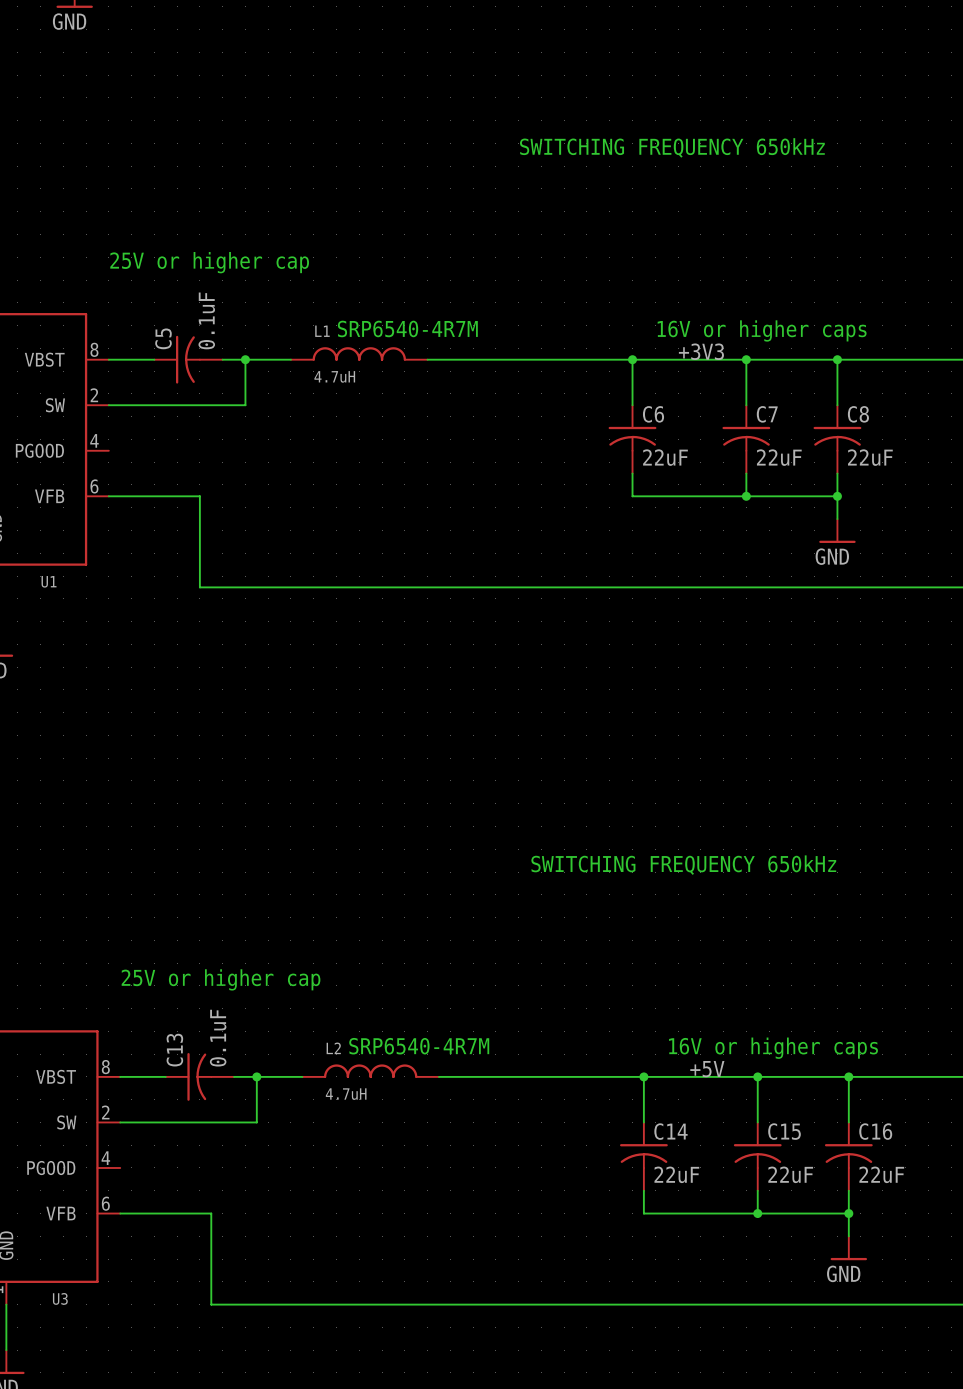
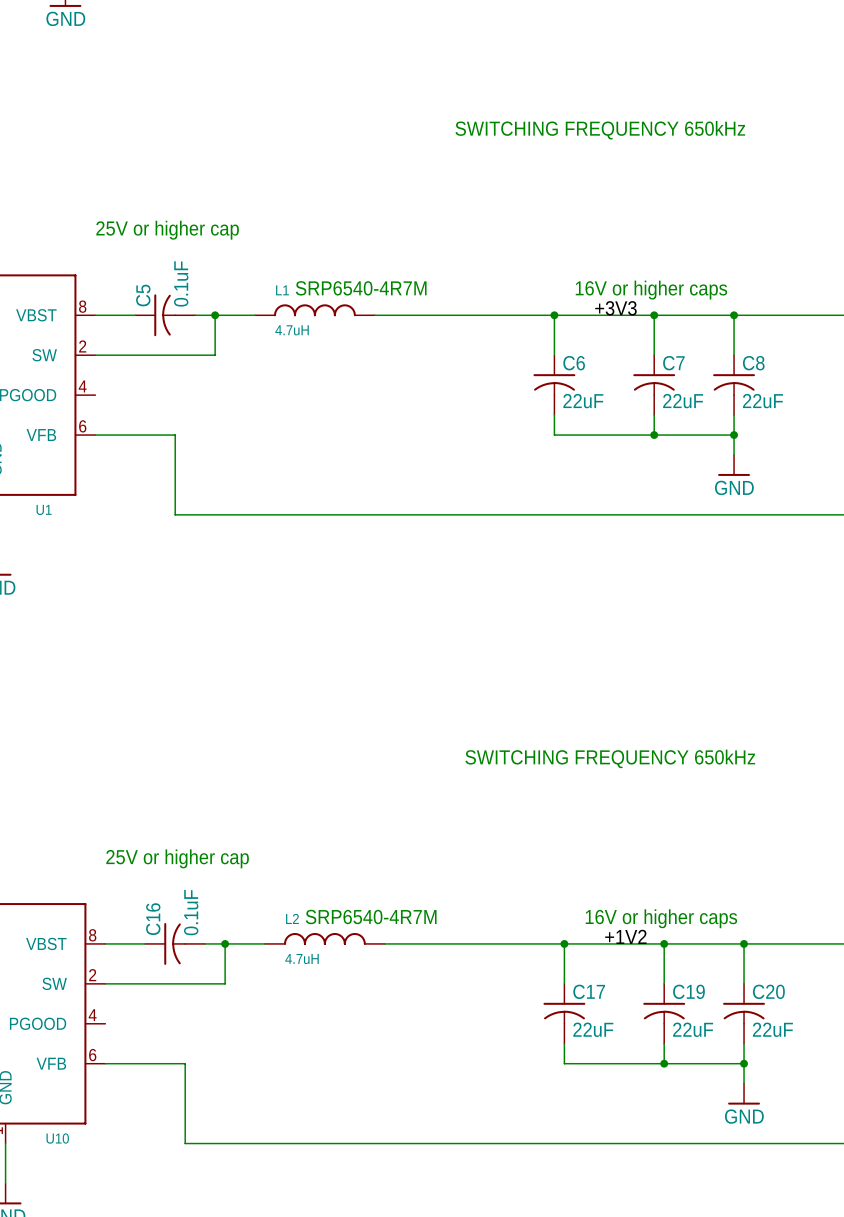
C13 name: C13 (174, 1050) -> C16 (153, 919)
label: +5V (707, 1069) -> +1V2 (625, 936)
C14 name: C14 (670, 1131) -> C17 (589, 991)
C15 name: C15 (784, 1131) -> C19 (688, 991)
C16 name: C16 (875, 1131) -> C20 (768, 991)
U3 name: U3 (60, 1298) -> U10 (57, 1138)

